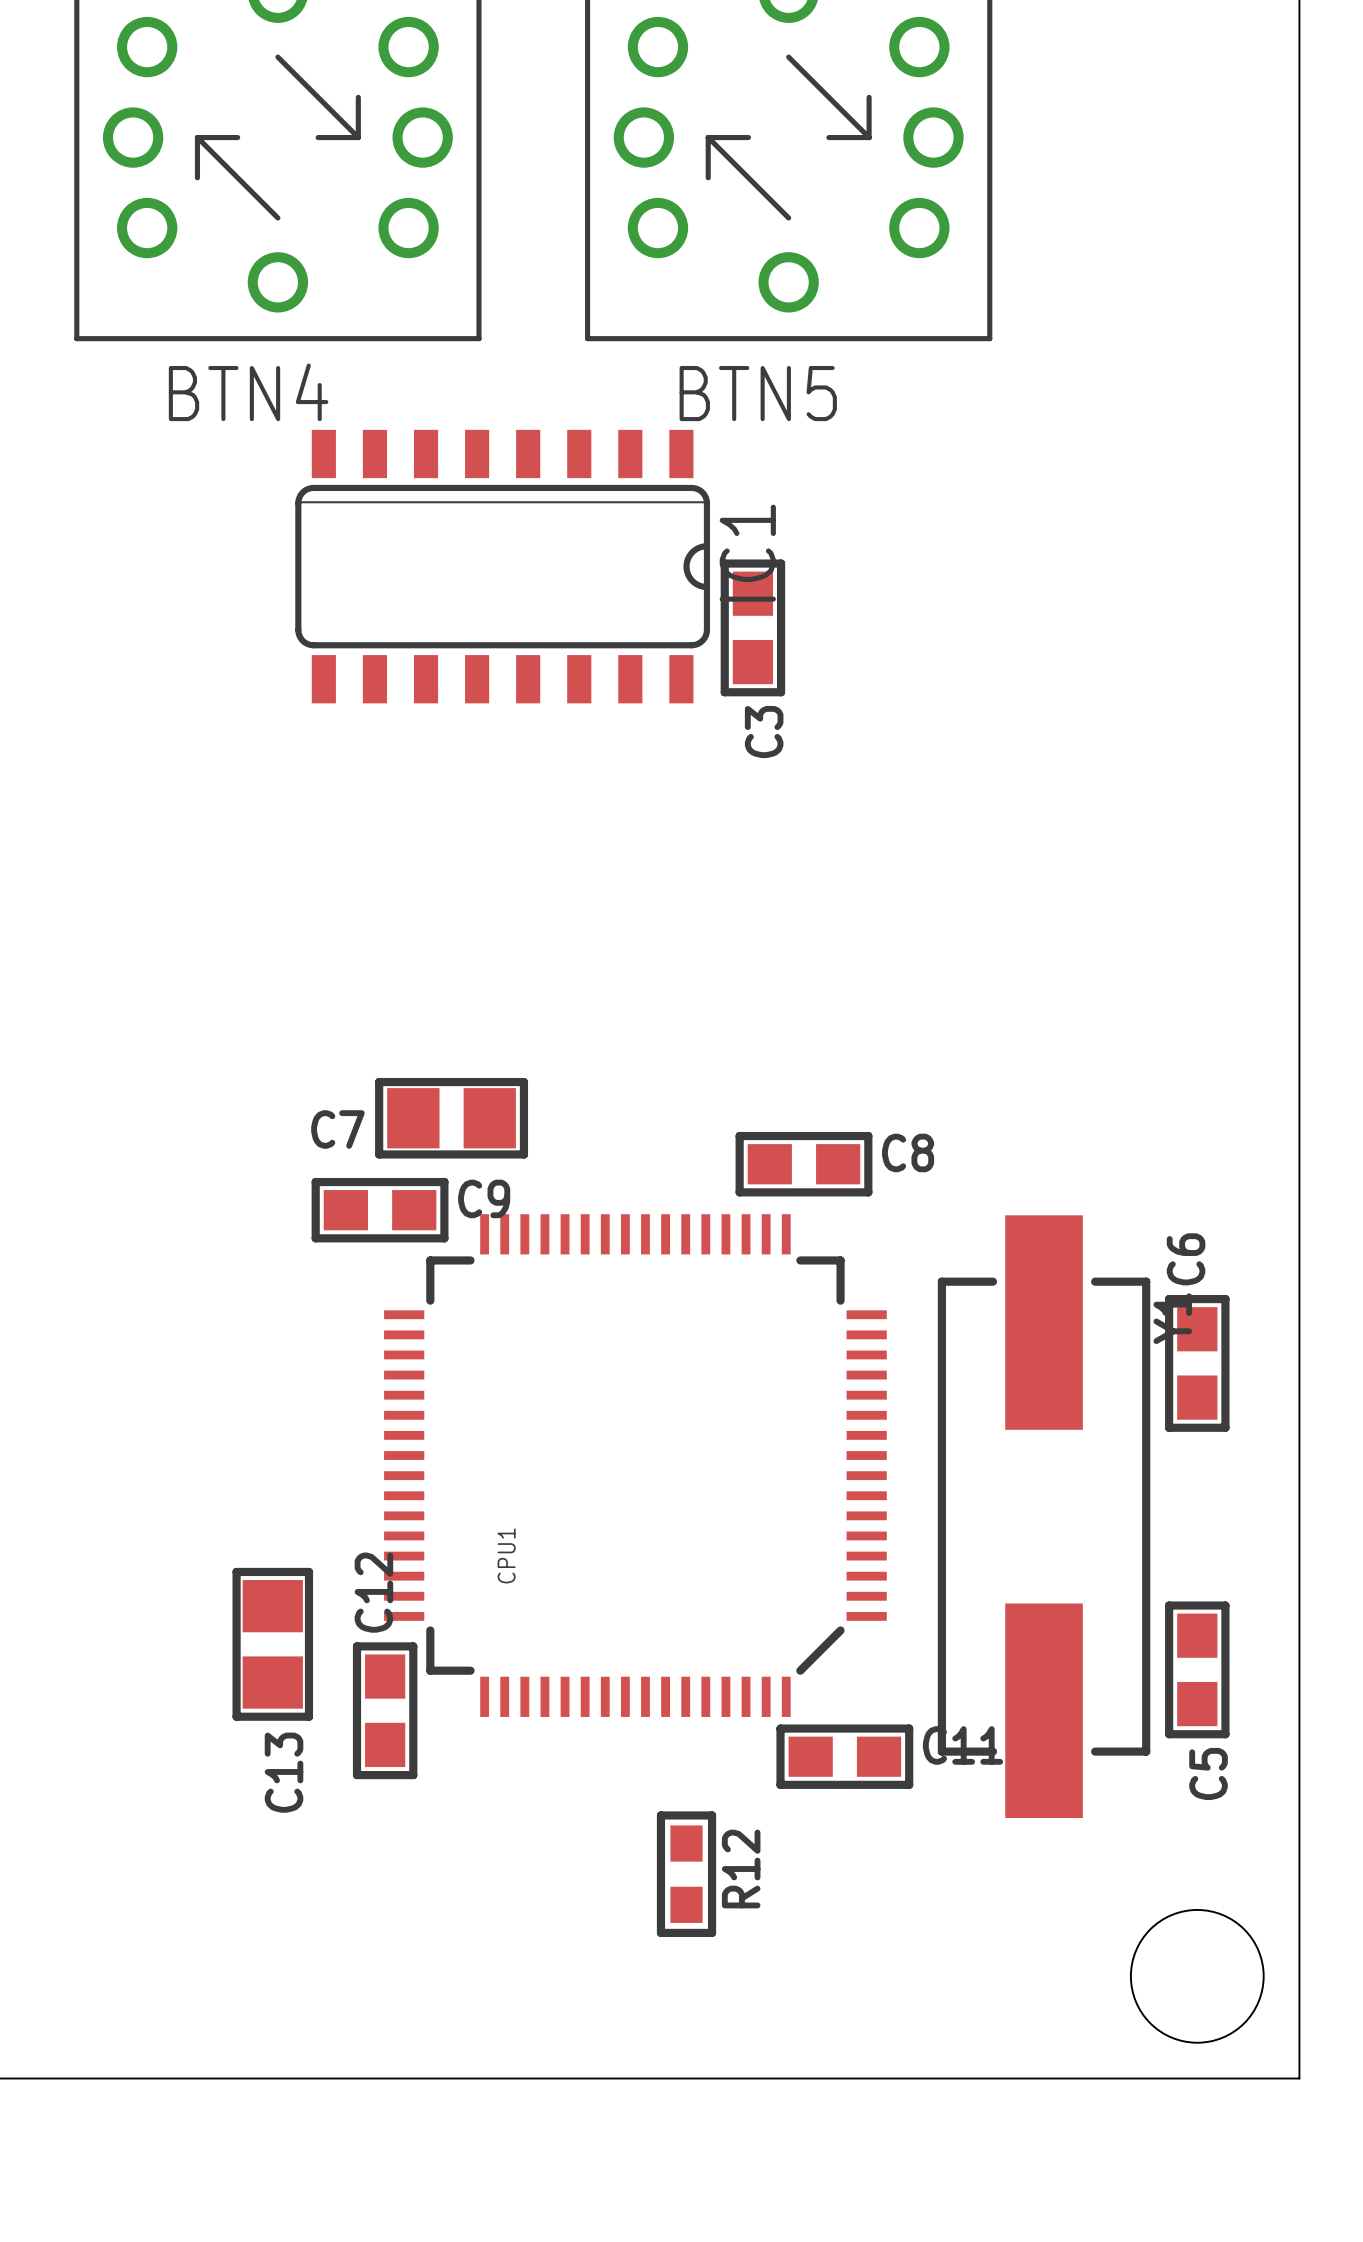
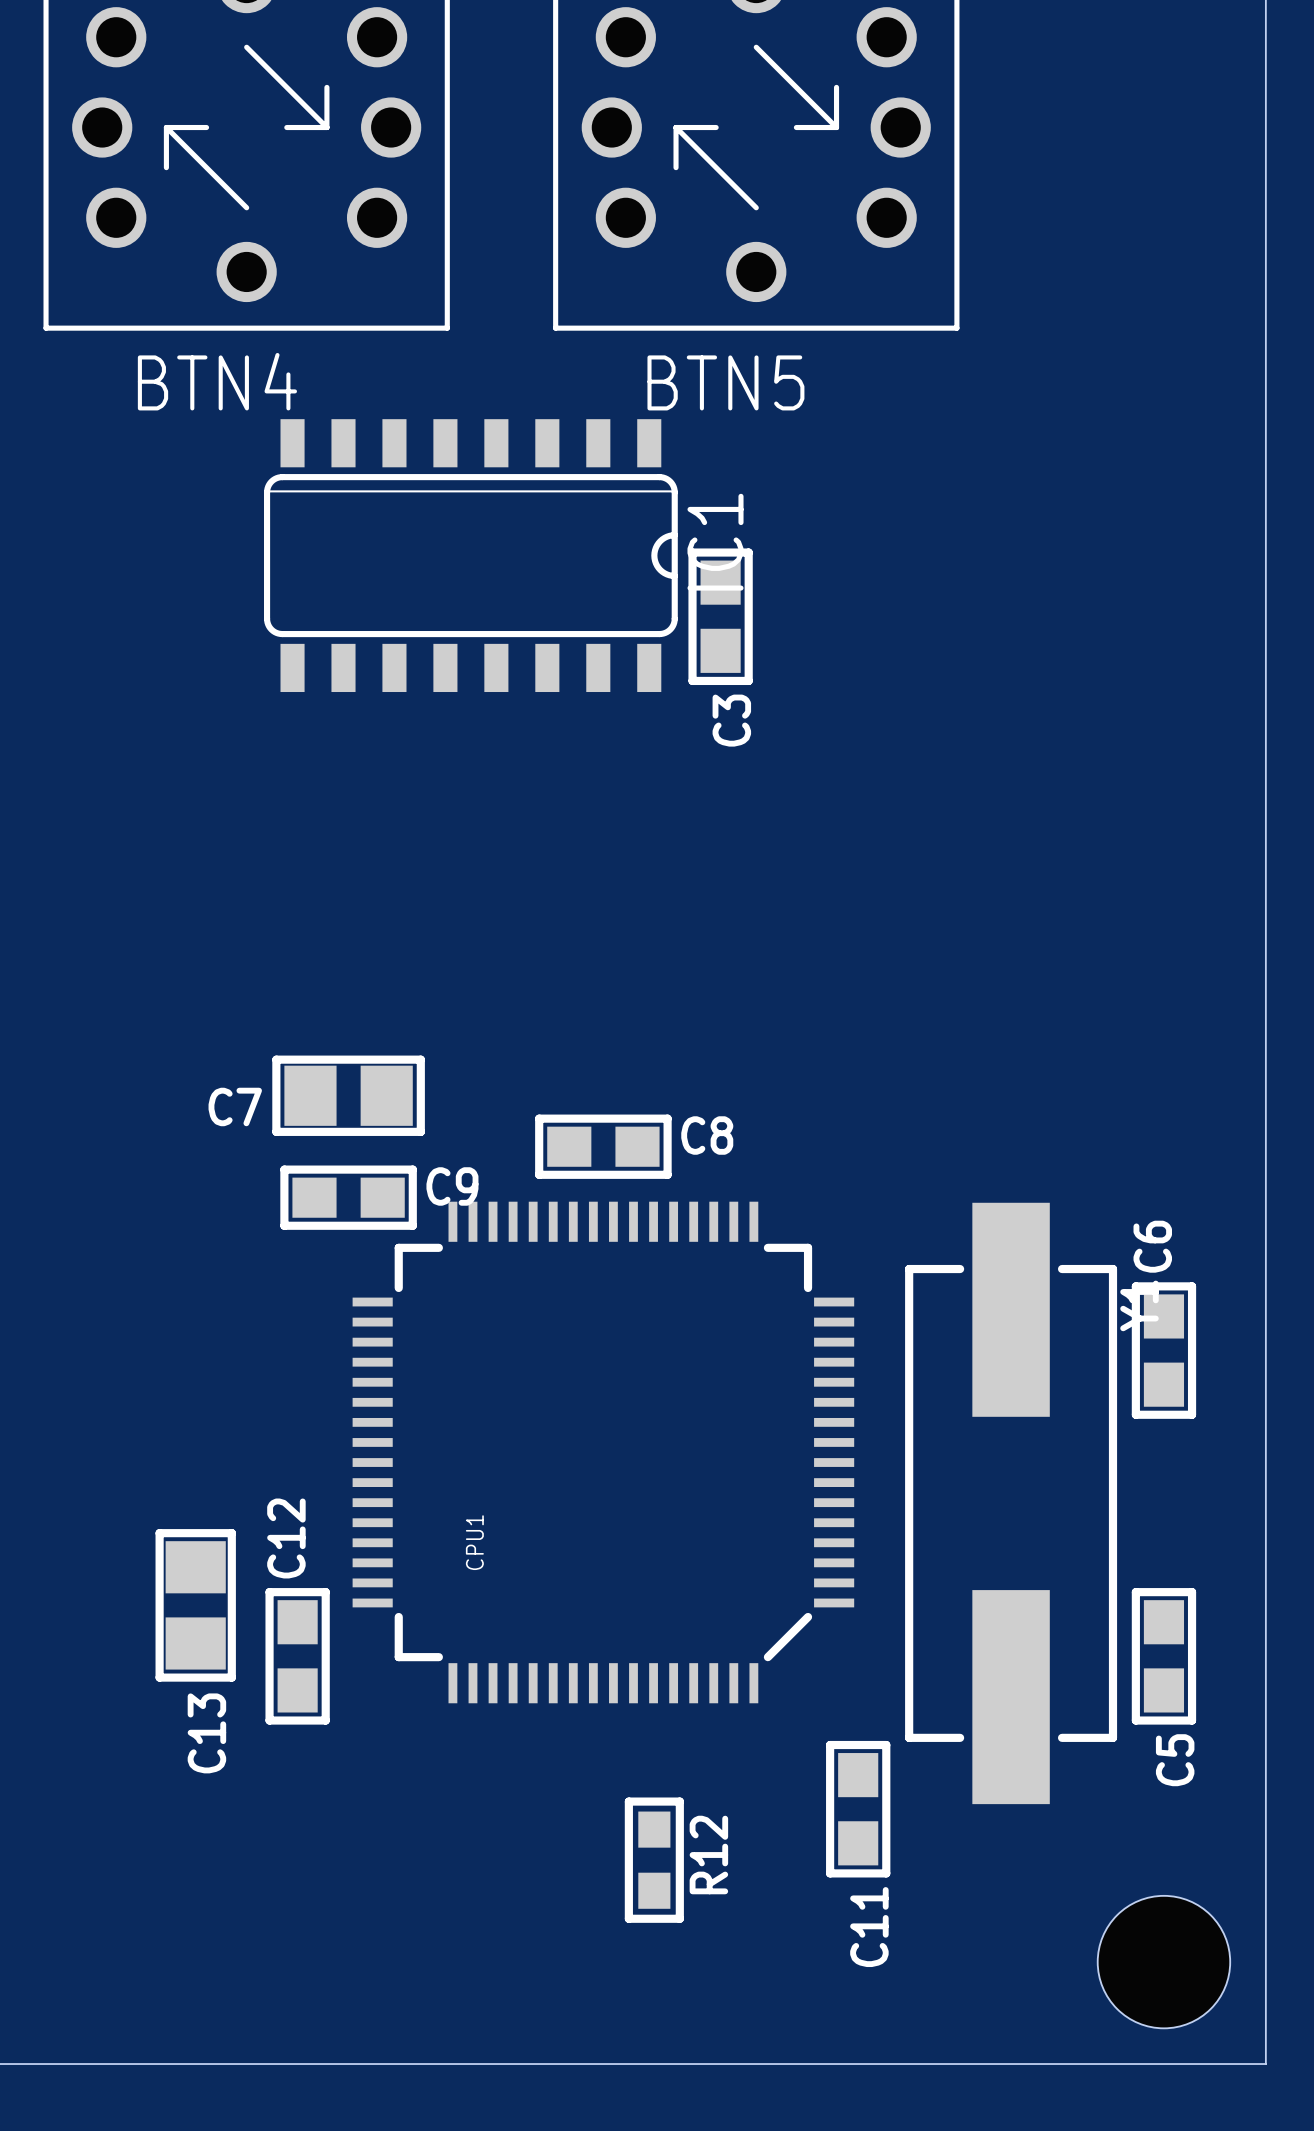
C7 position: (451, 1118) -> (348, 1095)
C8 position: (803, 1164) -> (603, 1146)
C13 position: (272, 1644) -> (195, 1605)
C12 position: (385, 1710) -> (297, 1656)
C11 rotation: 0° (844, 1756) -> 90° clockwise (858, 1809)

